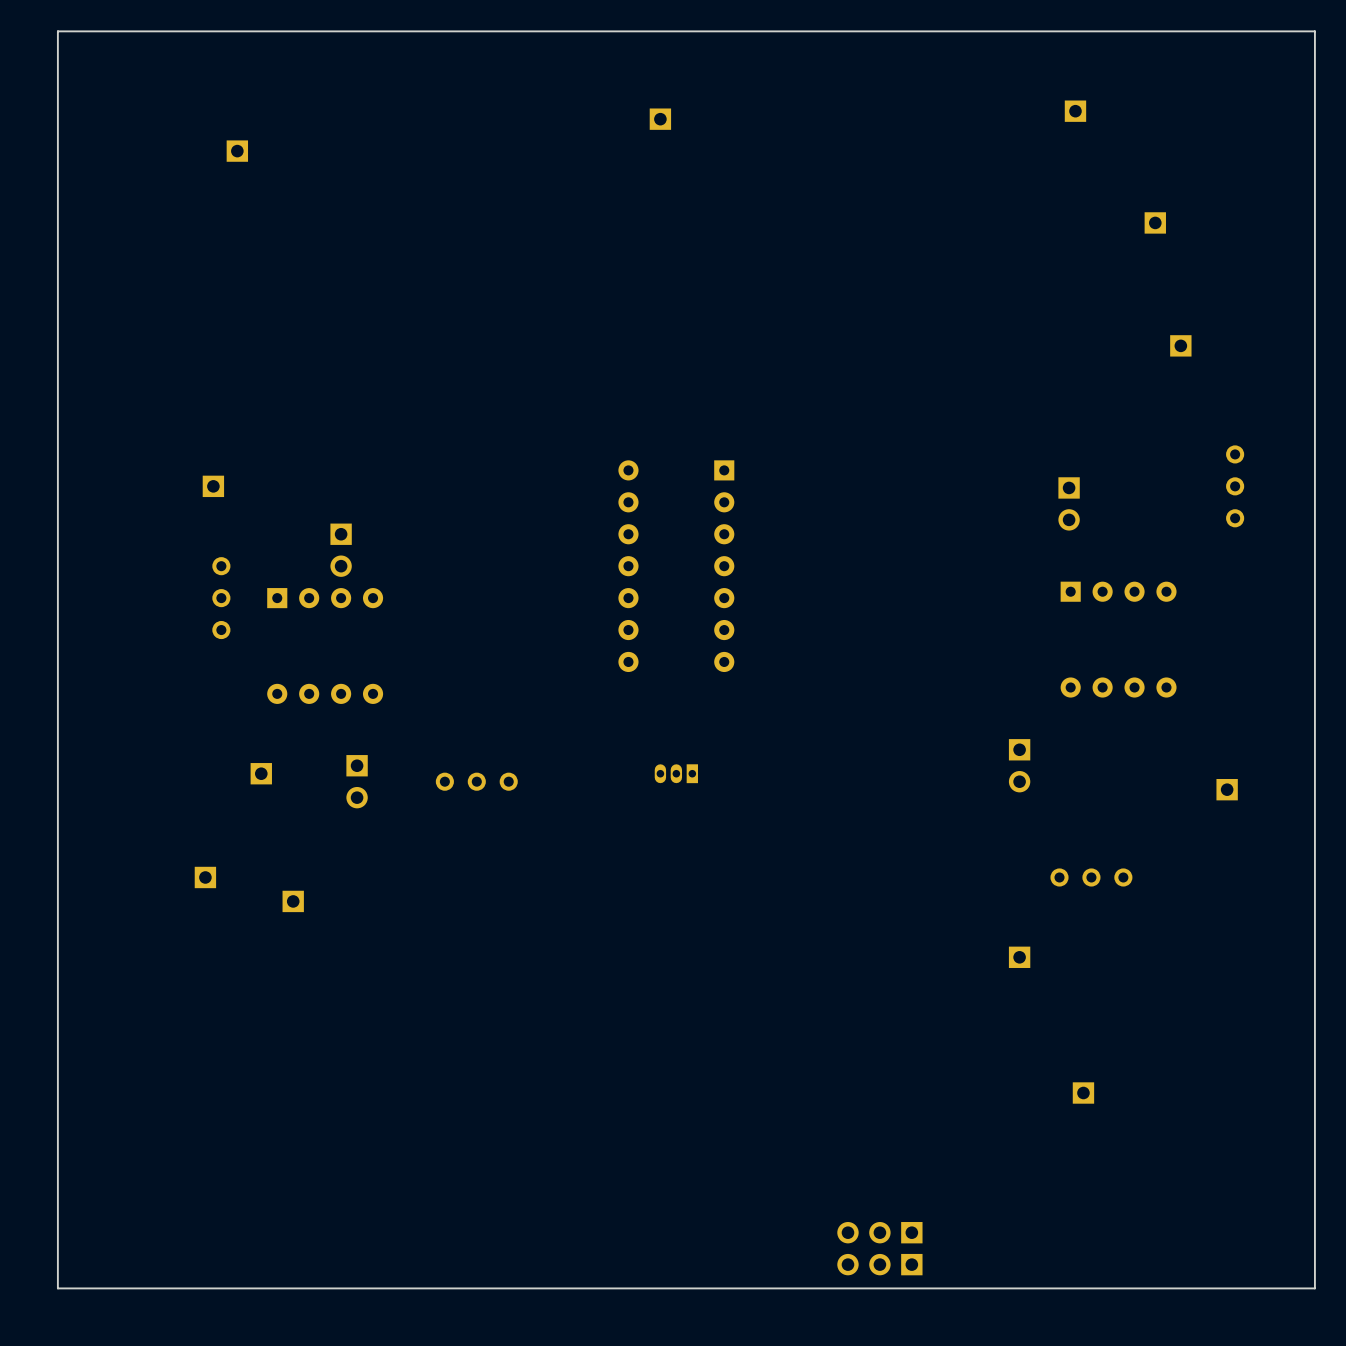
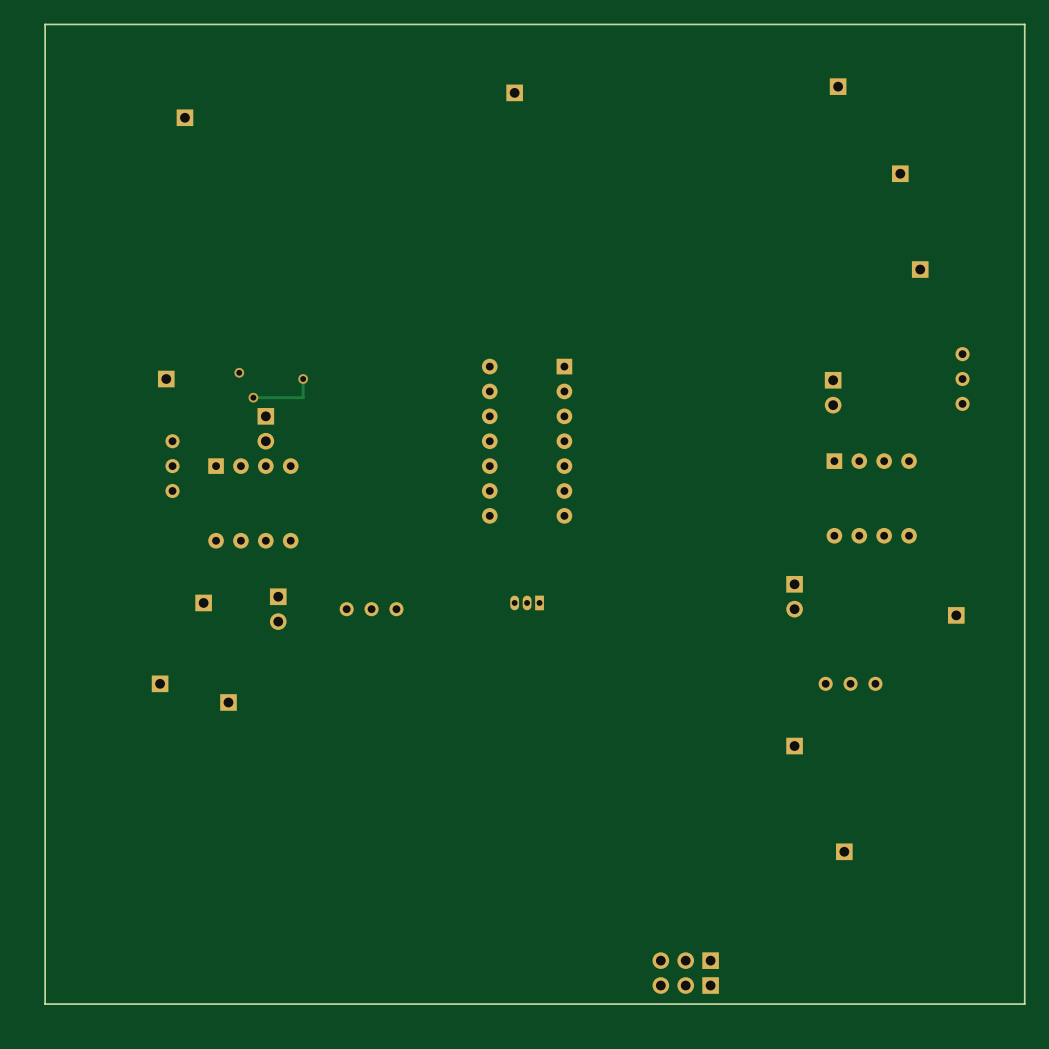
via: none -> (239, 372)
track: none -> (303, 379) (303, 397) (253, 397)
via: none -> (303, 379)
via: none -> (253, 397)

